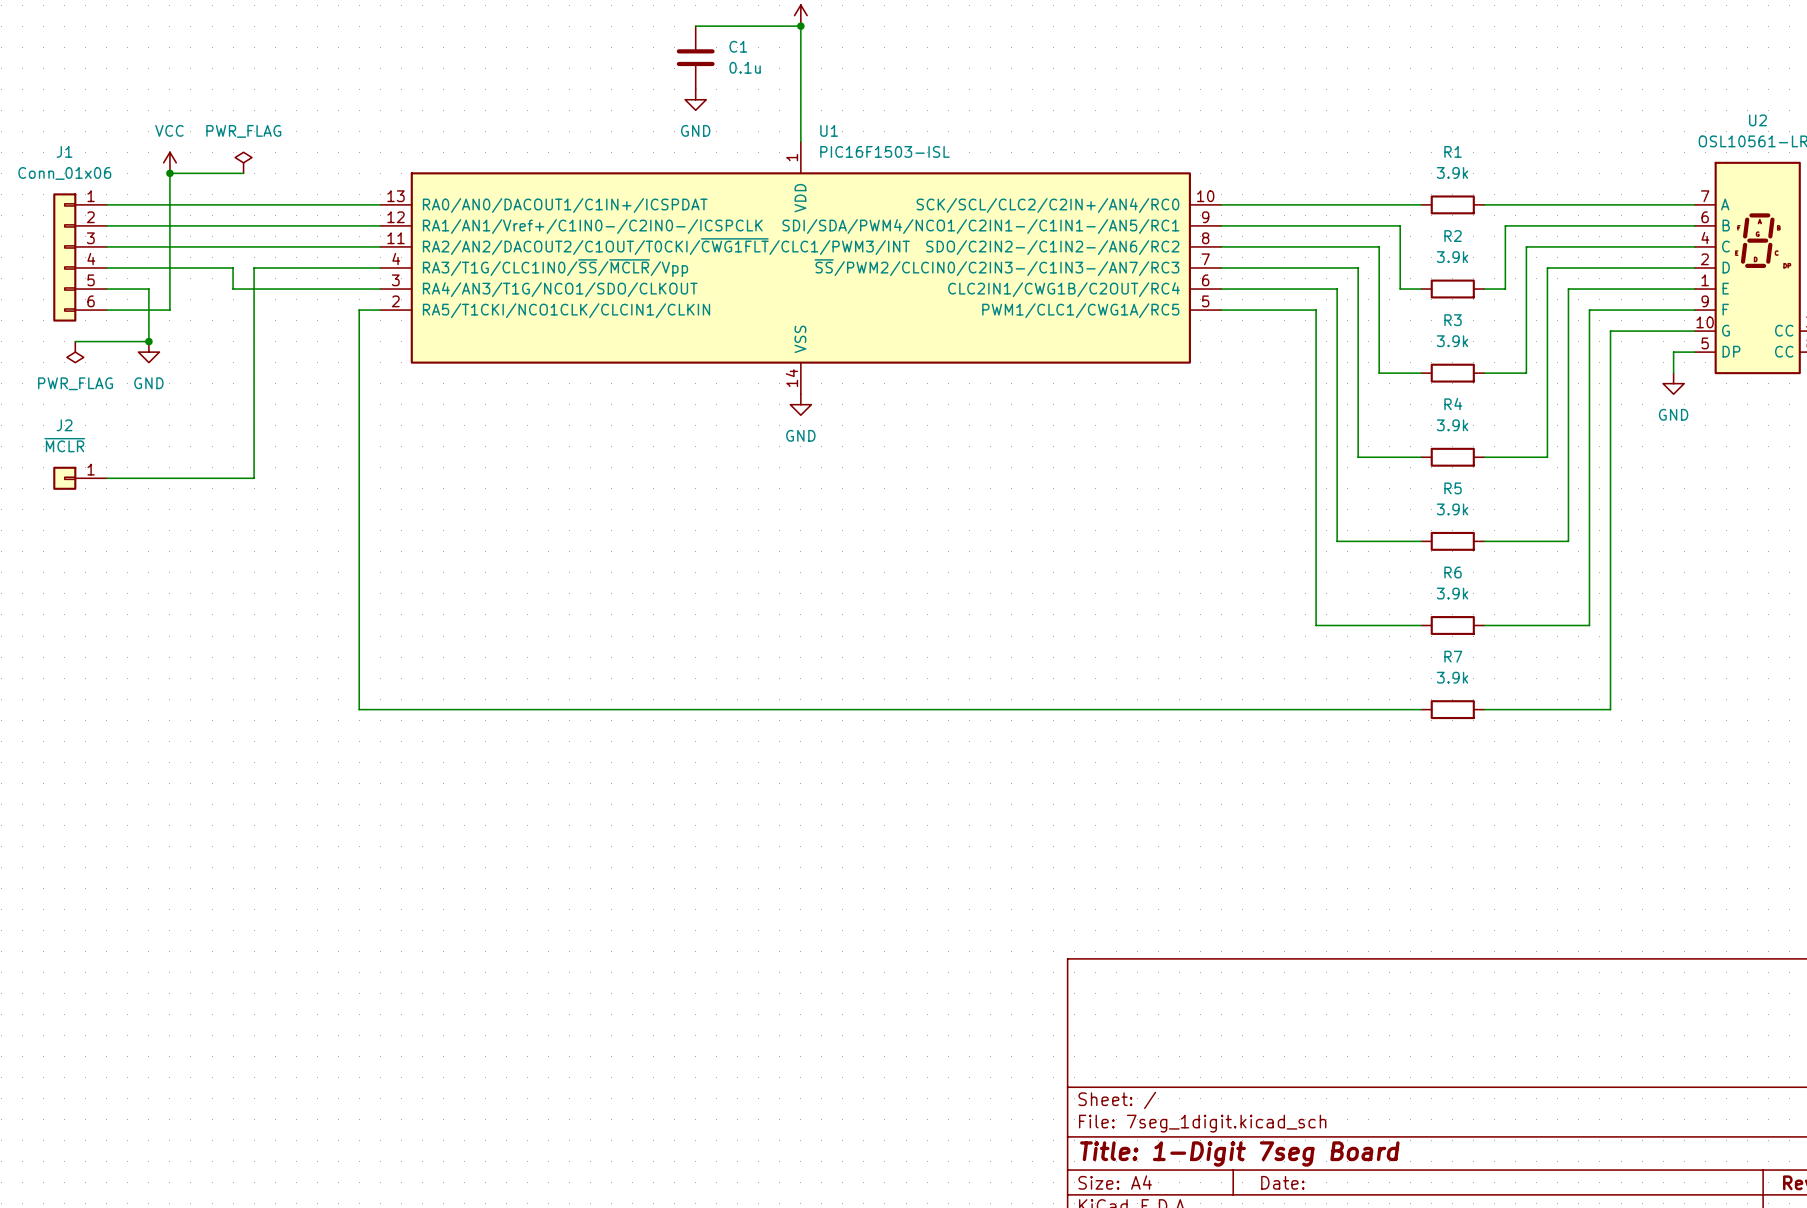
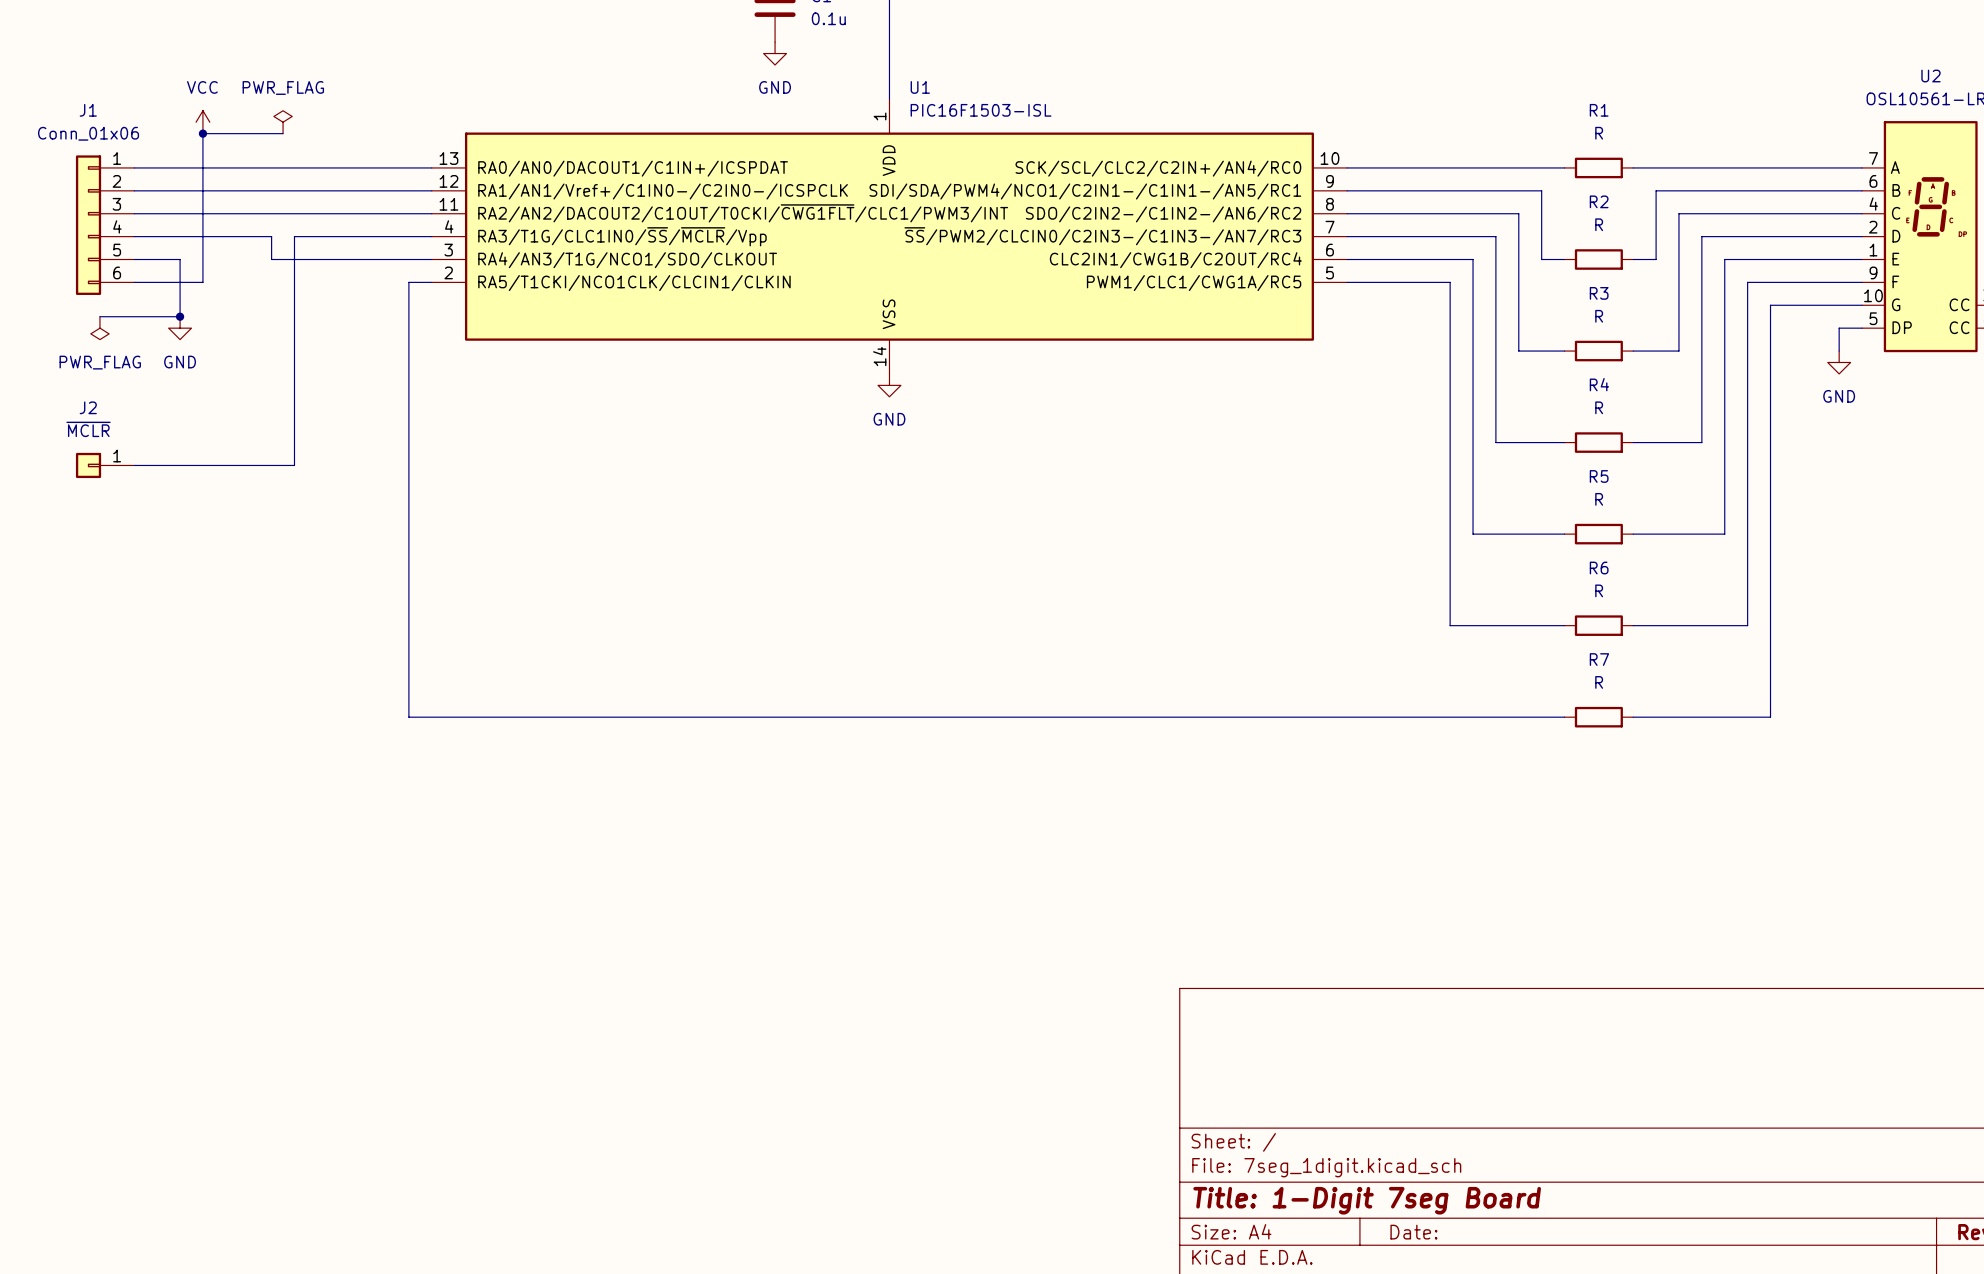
R1 value: 3.9k (1452, 172) -> R (1599, 133)
R2 value: 3.9k (1452, 257) -> R (1599, 224)
R3 value: 3.9k (1452, 341) -> R (1599, 316)
R4 value: 3.9k (1452, 425) -> R (1599, 407)
R5 value: 3.9k (1452, 509) -> R (1599, 499)
R6 value: 3.9k (1452, 593) -> R (1599, 590)
R7 value: 3.9k (1452, 677) -> R (1599, 682)

